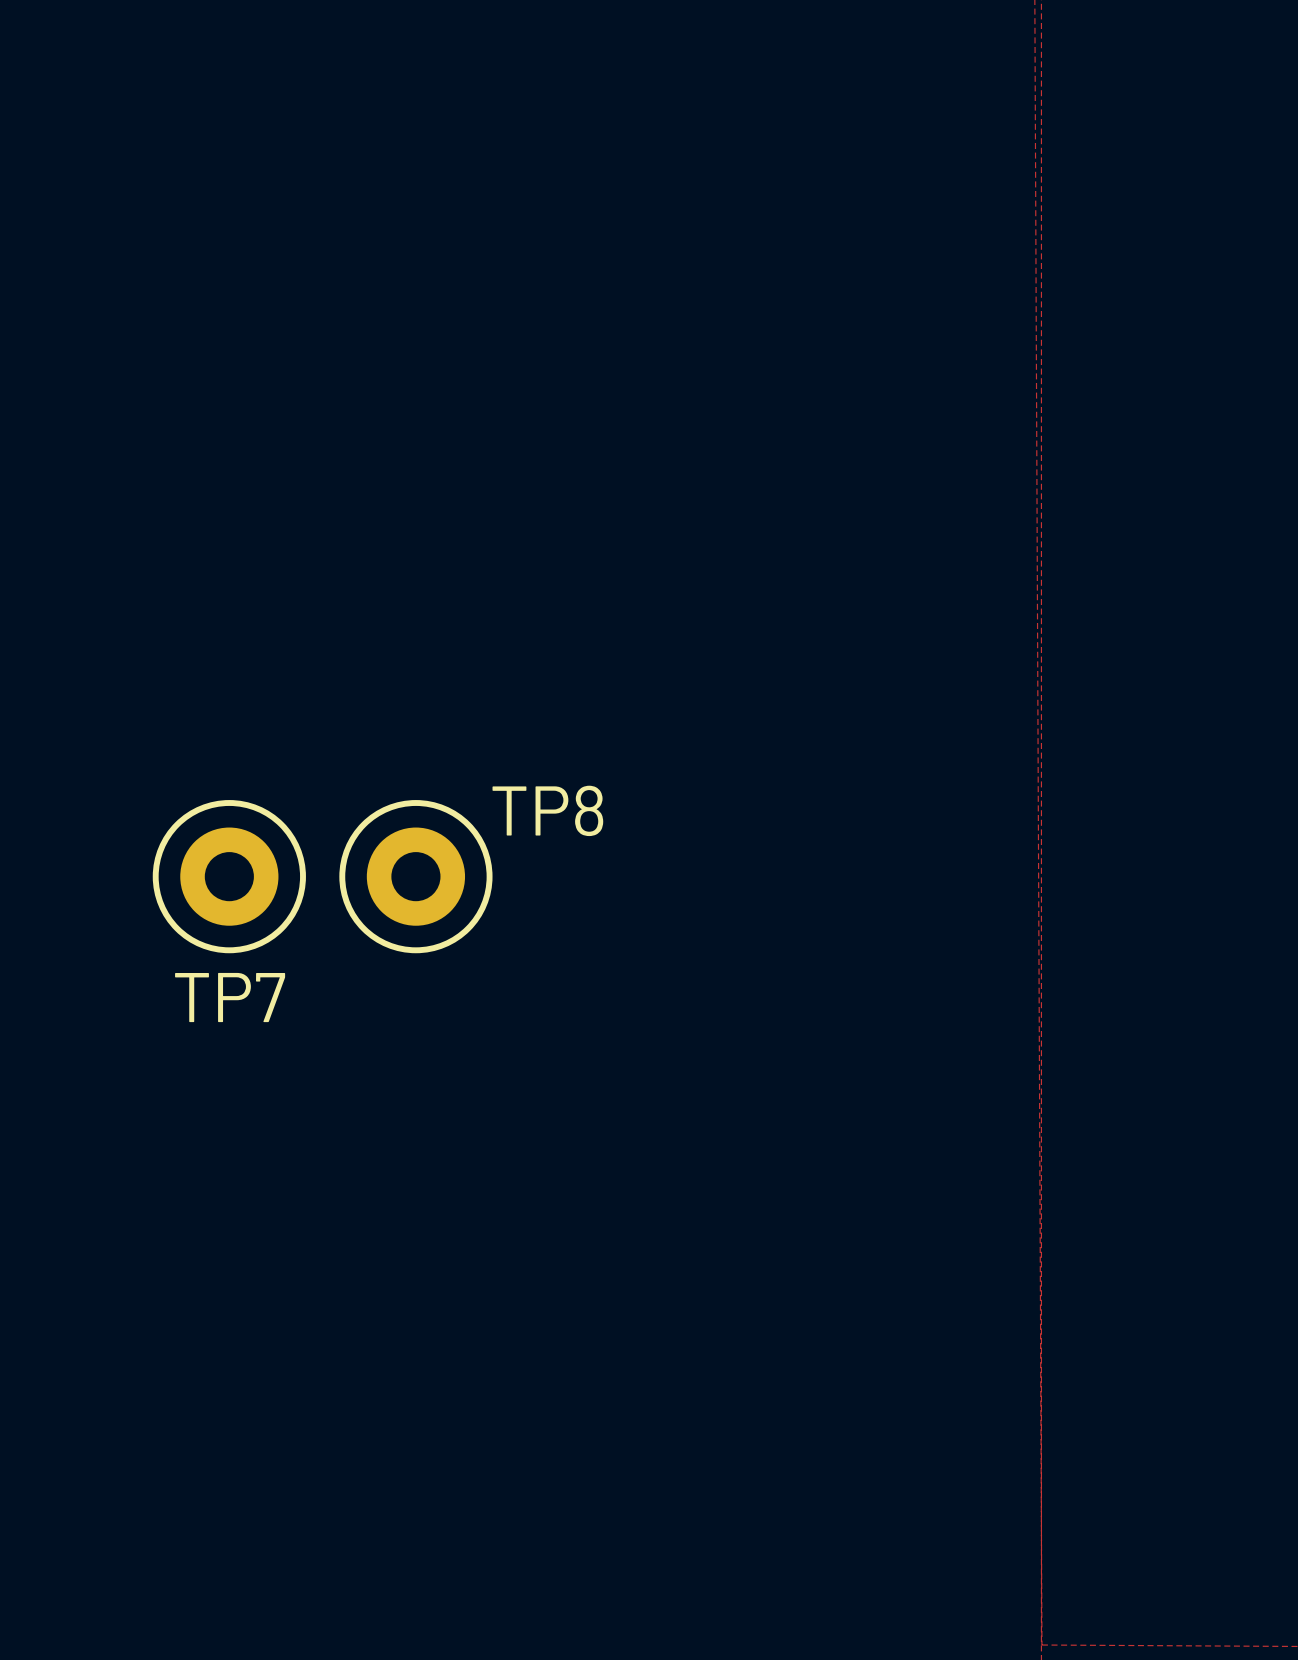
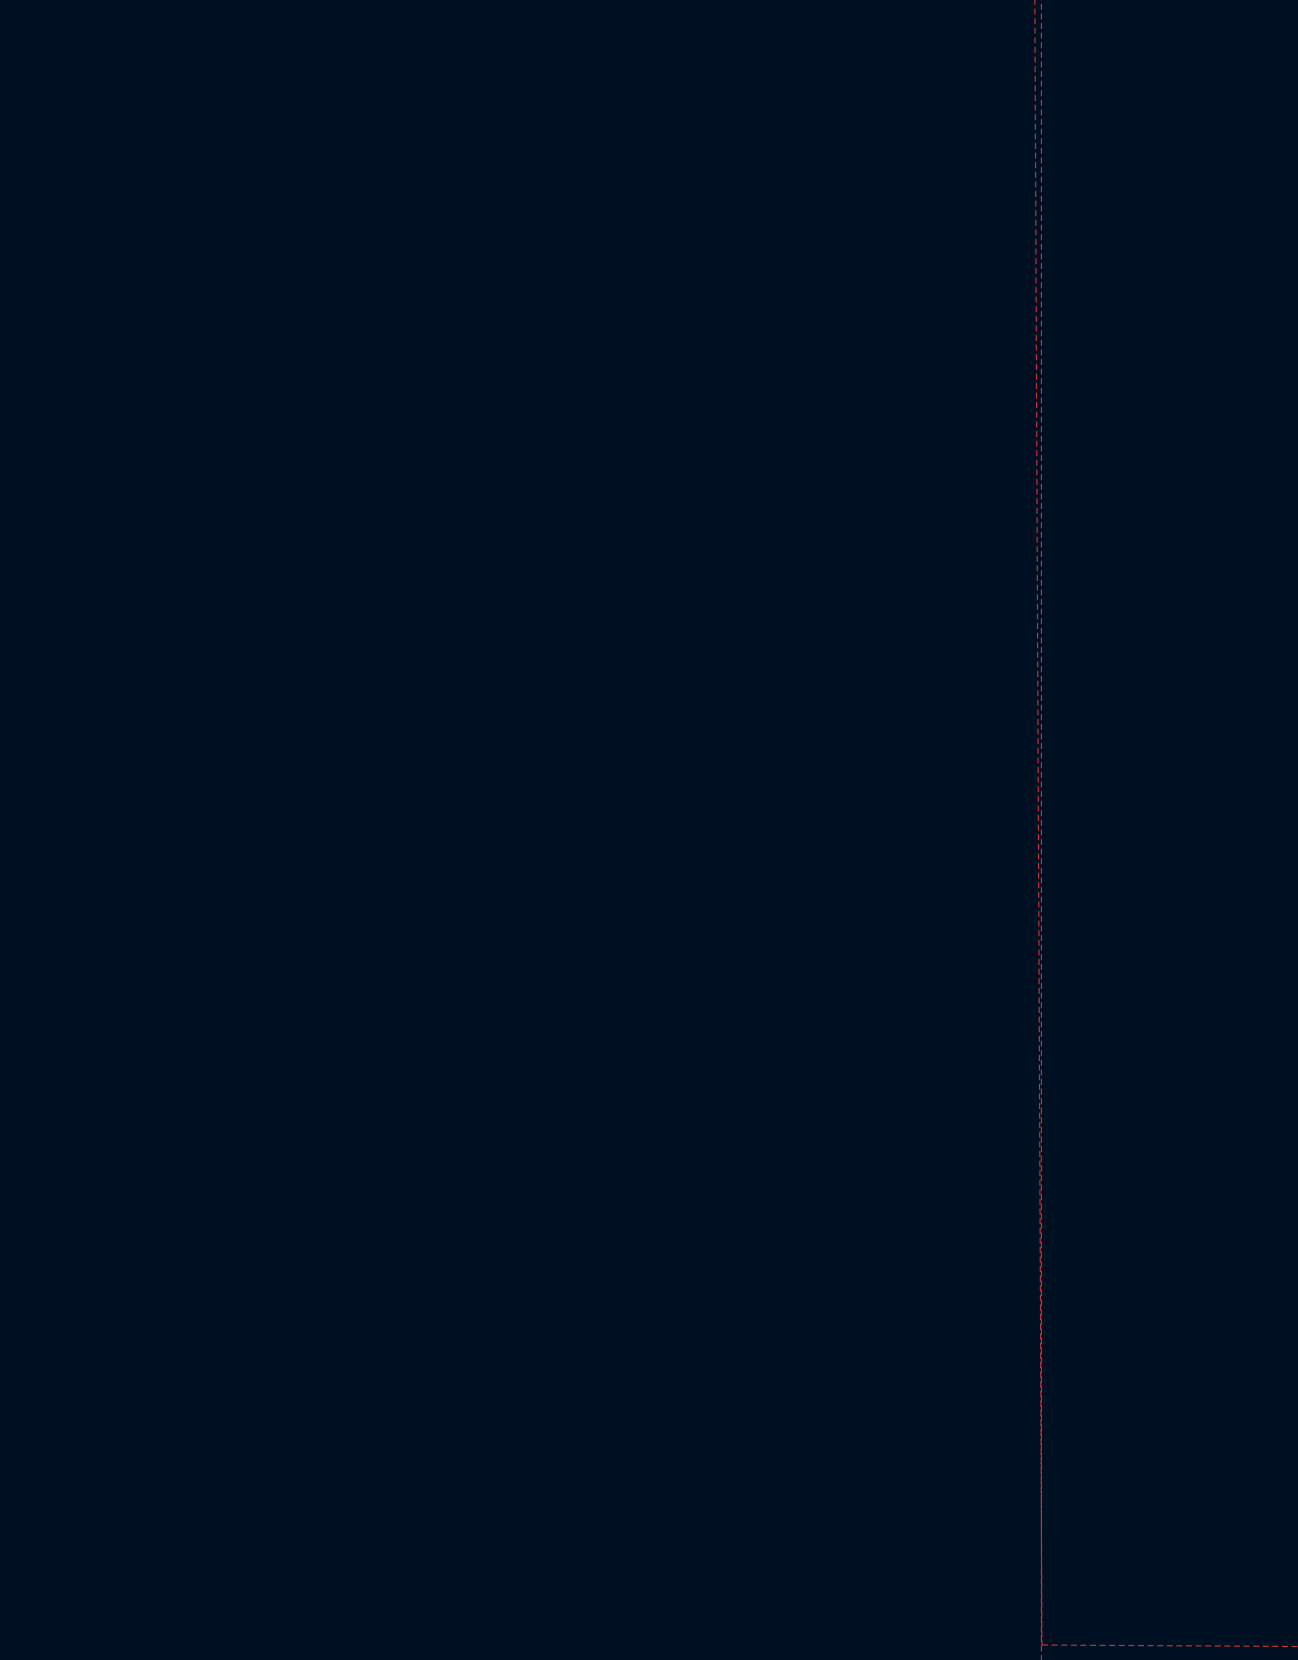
TP7: (229, 876) -> none
TP8: (415, 876) -> none

